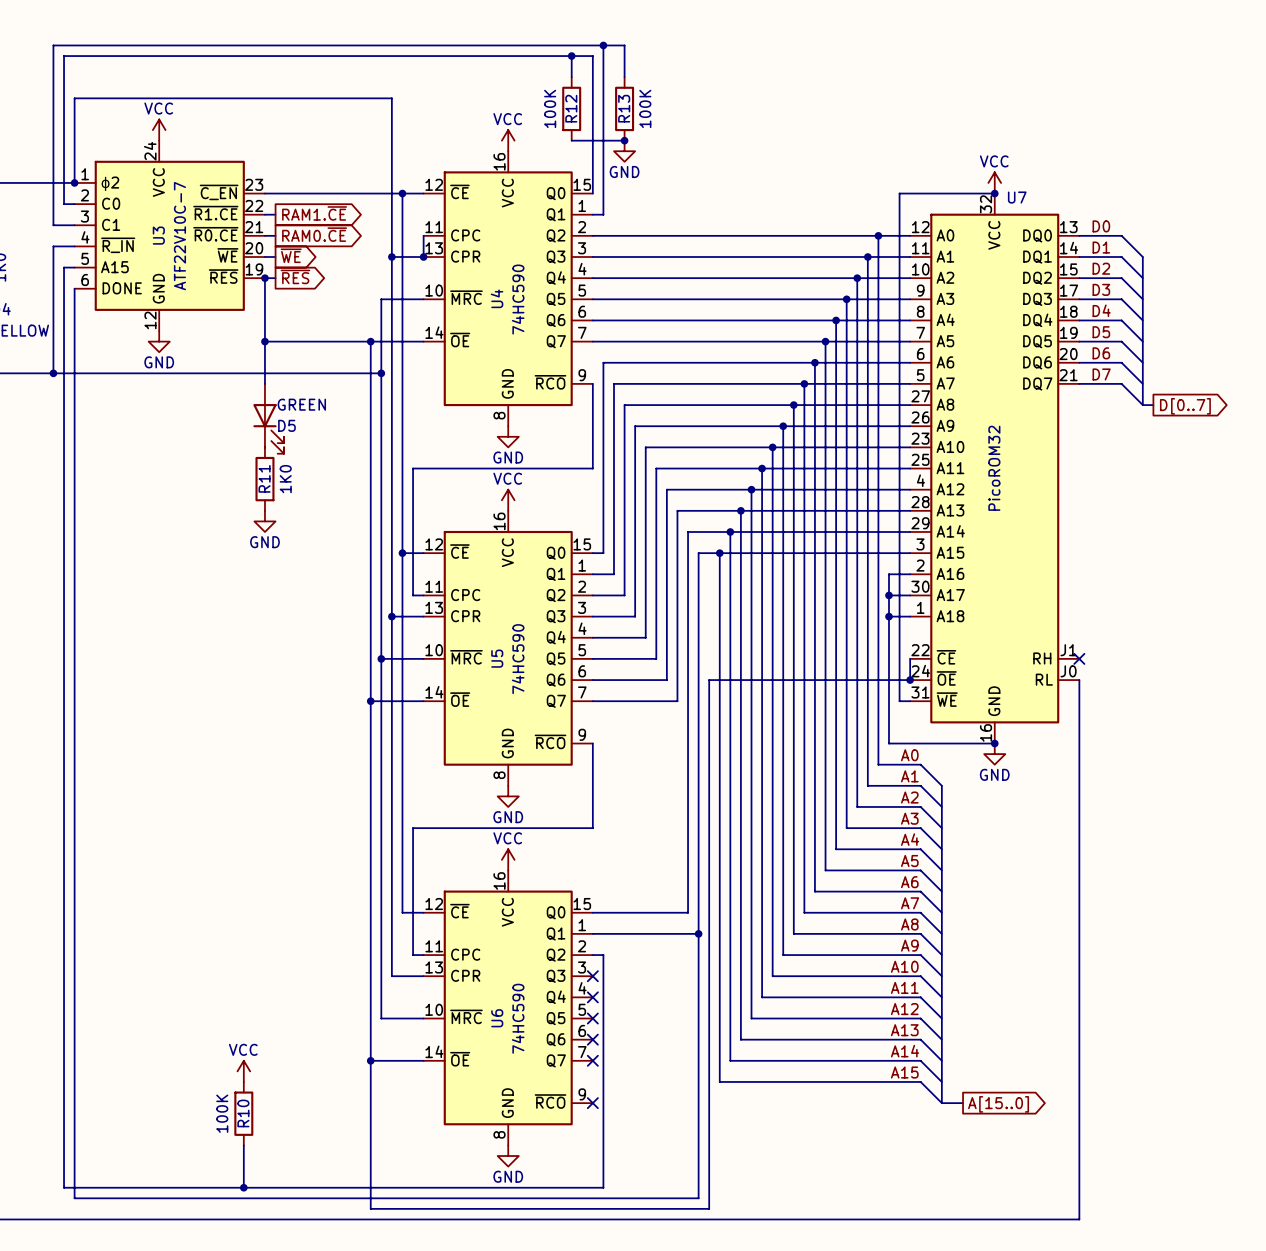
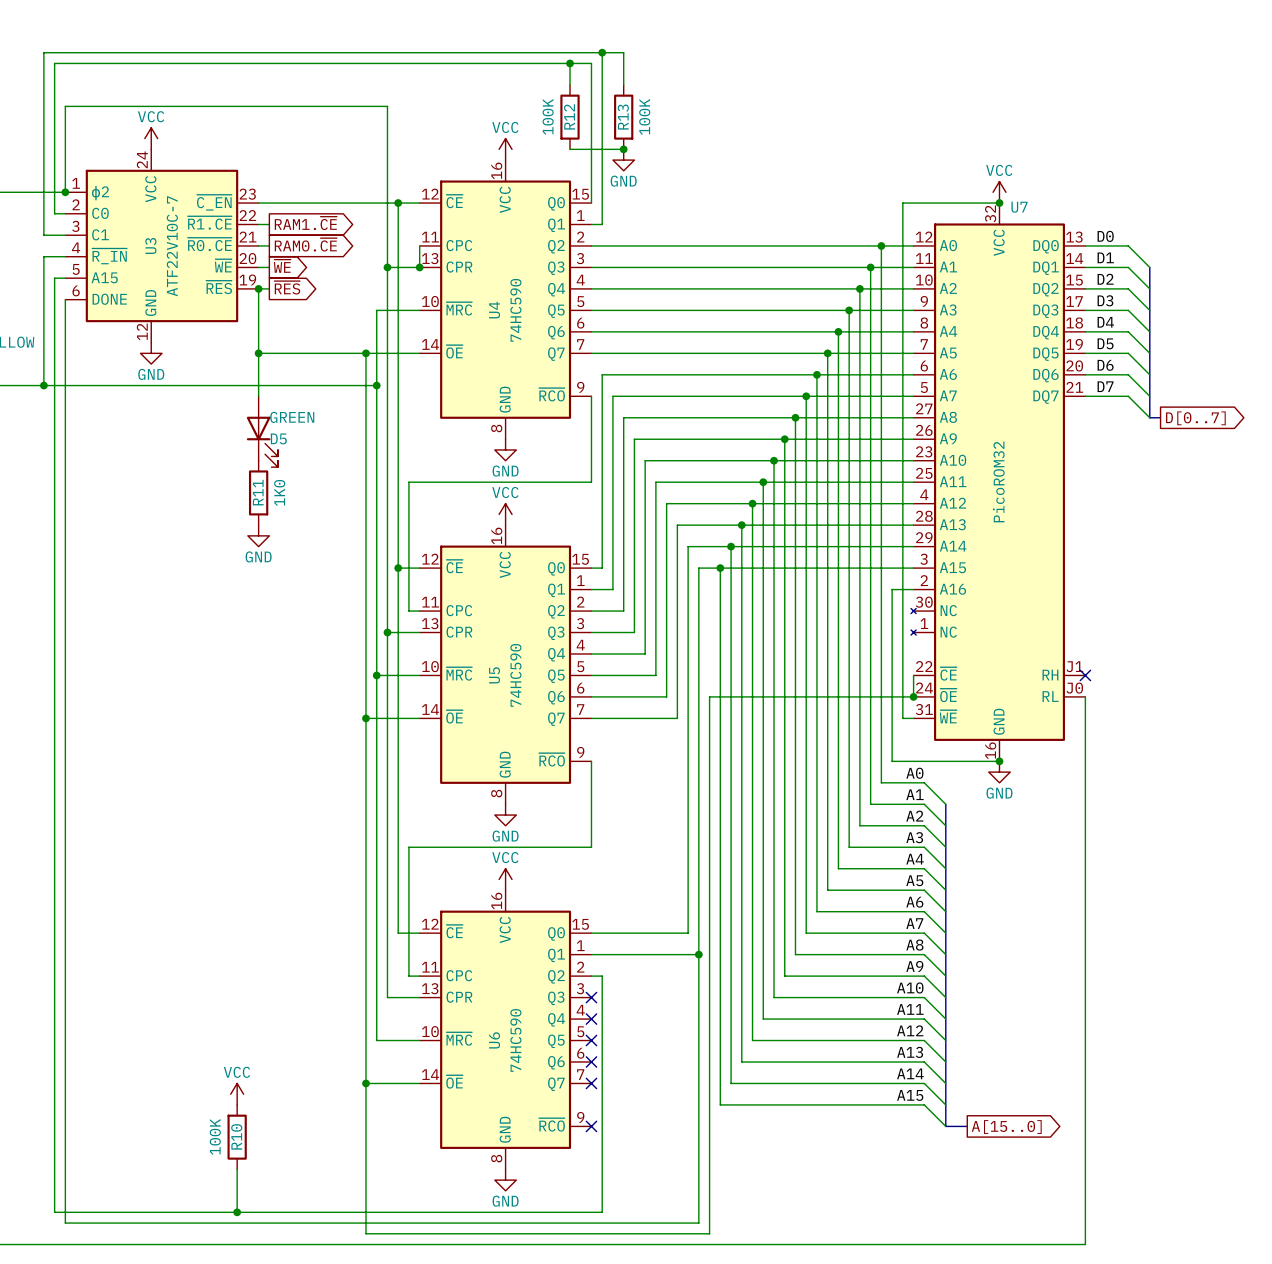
U7 symbol: [910, 193, 1080, 744] -> [911, 203, 1086, 762]
wire: (888, 595) (910, 595) -> none
junction: (888, 595) -> none
wire: (888, 616) (910, 616) -> none
junction: (888, 616) -> none

